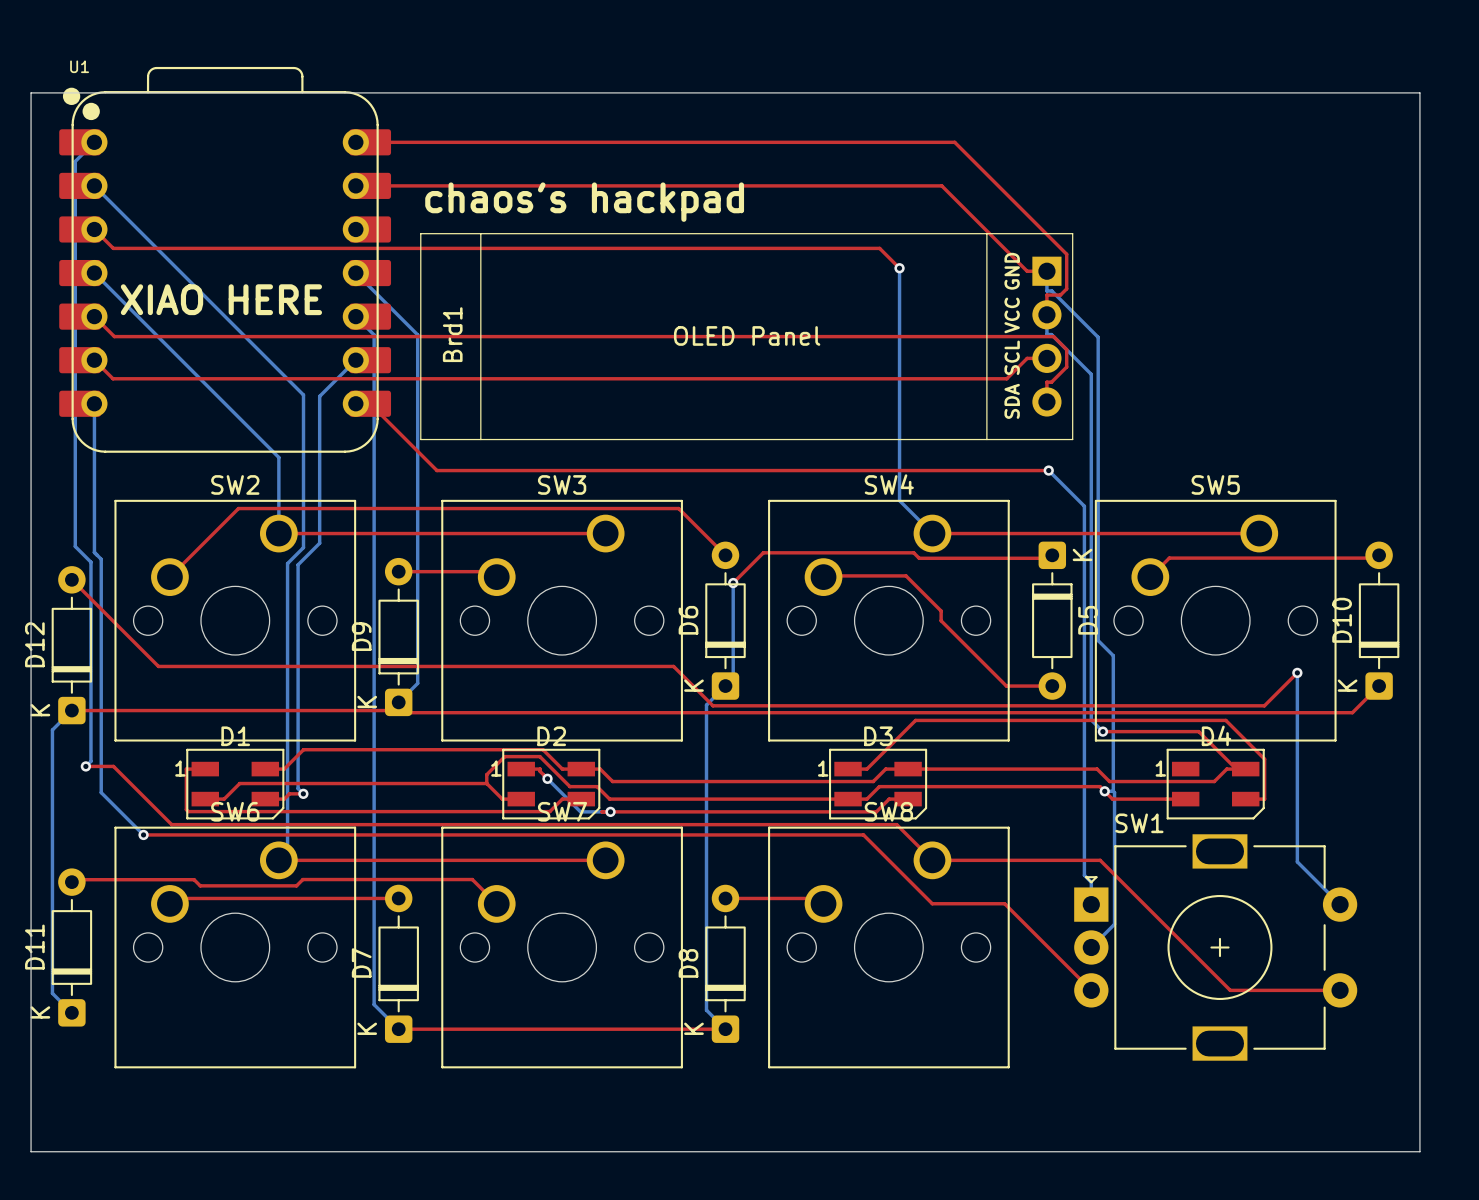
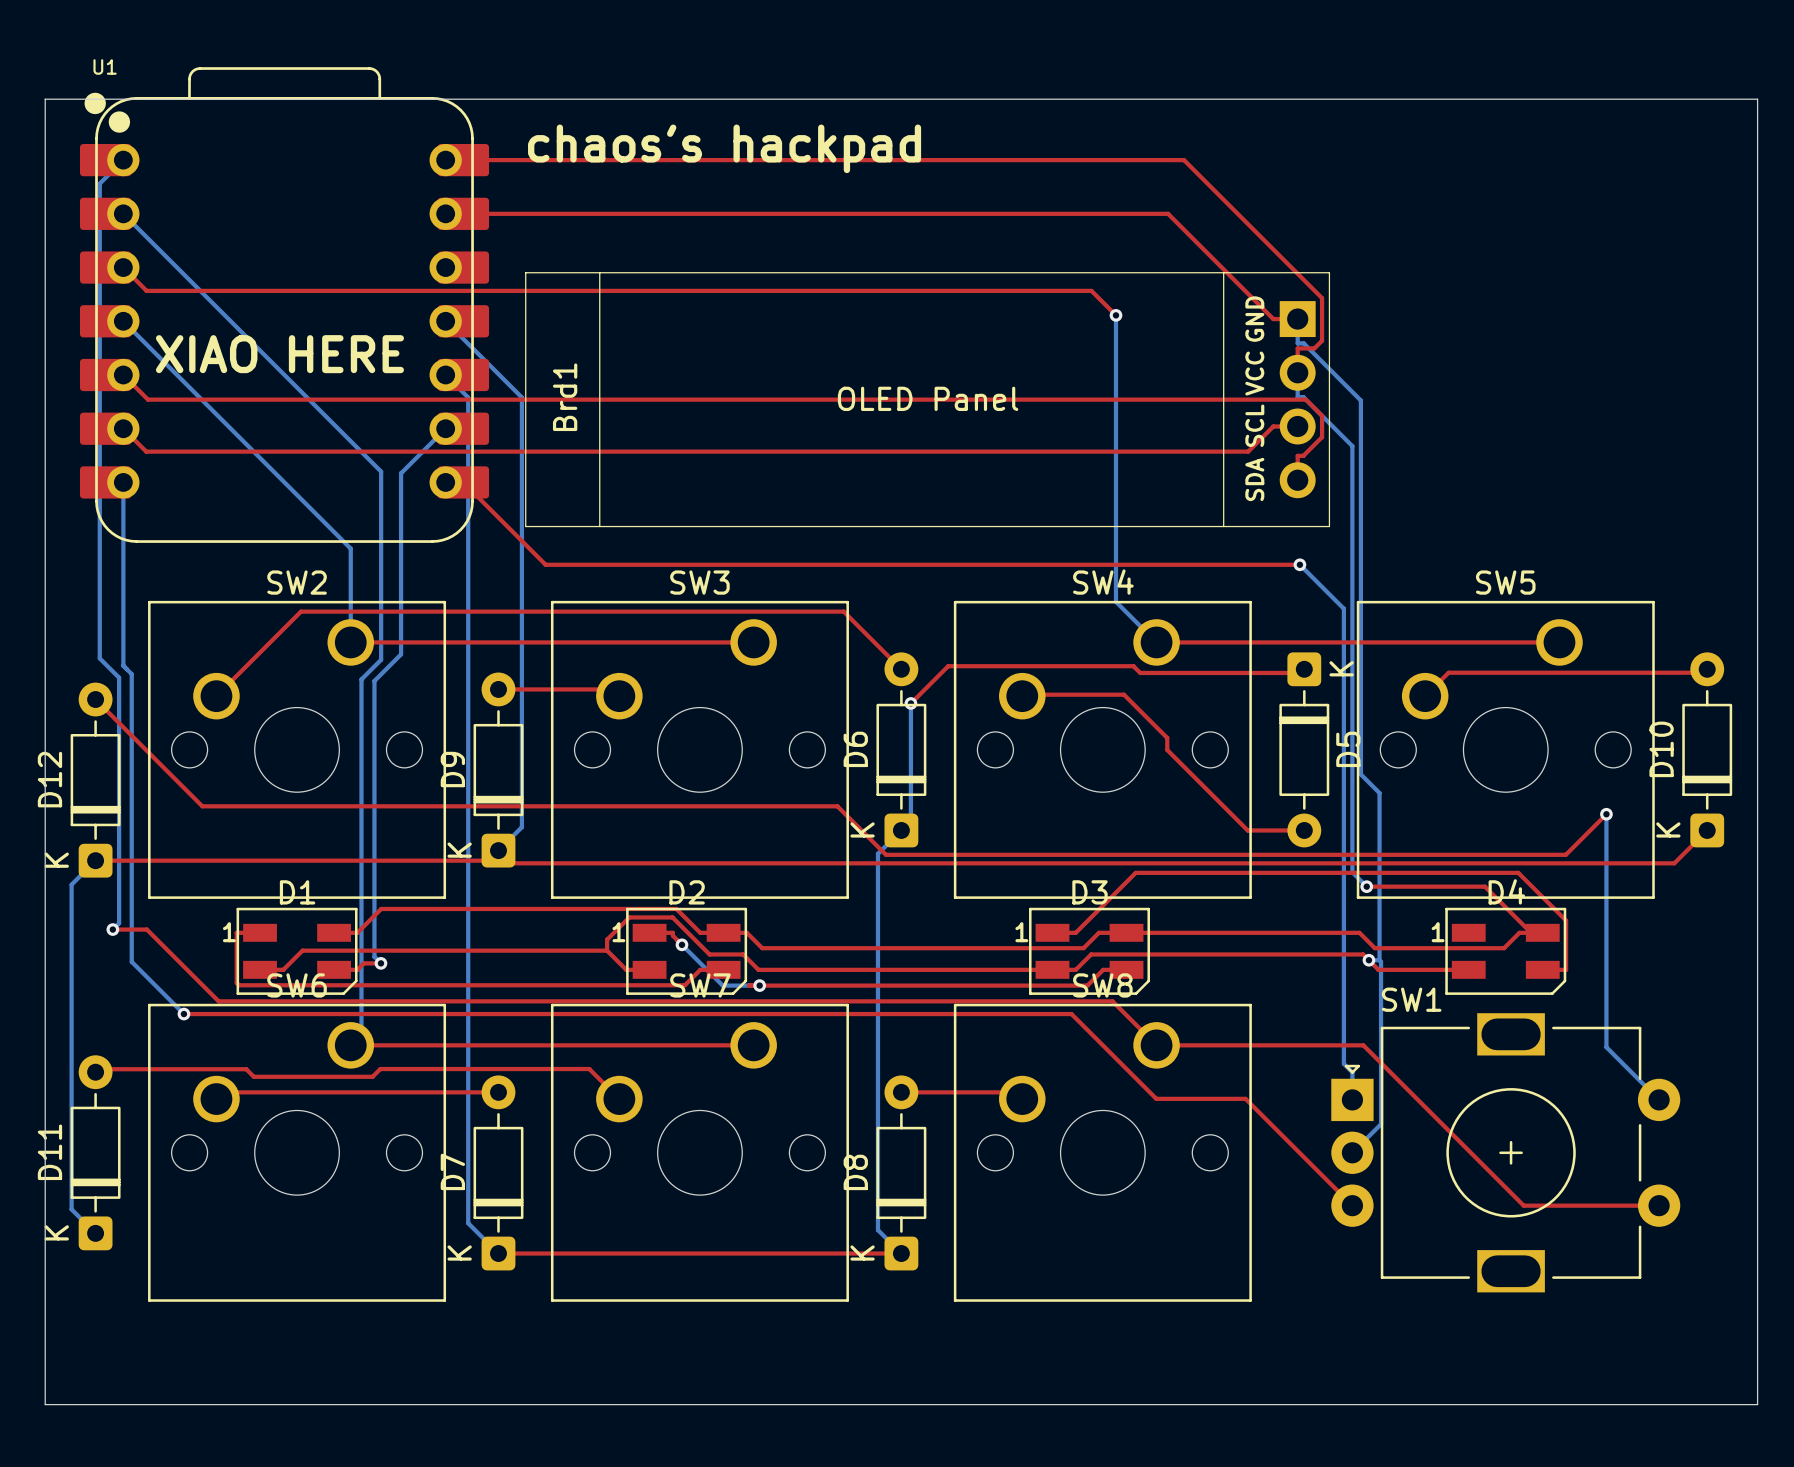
text position: chaos's hackpad (584, 202) -> chaos's hackpad (724, 148)

